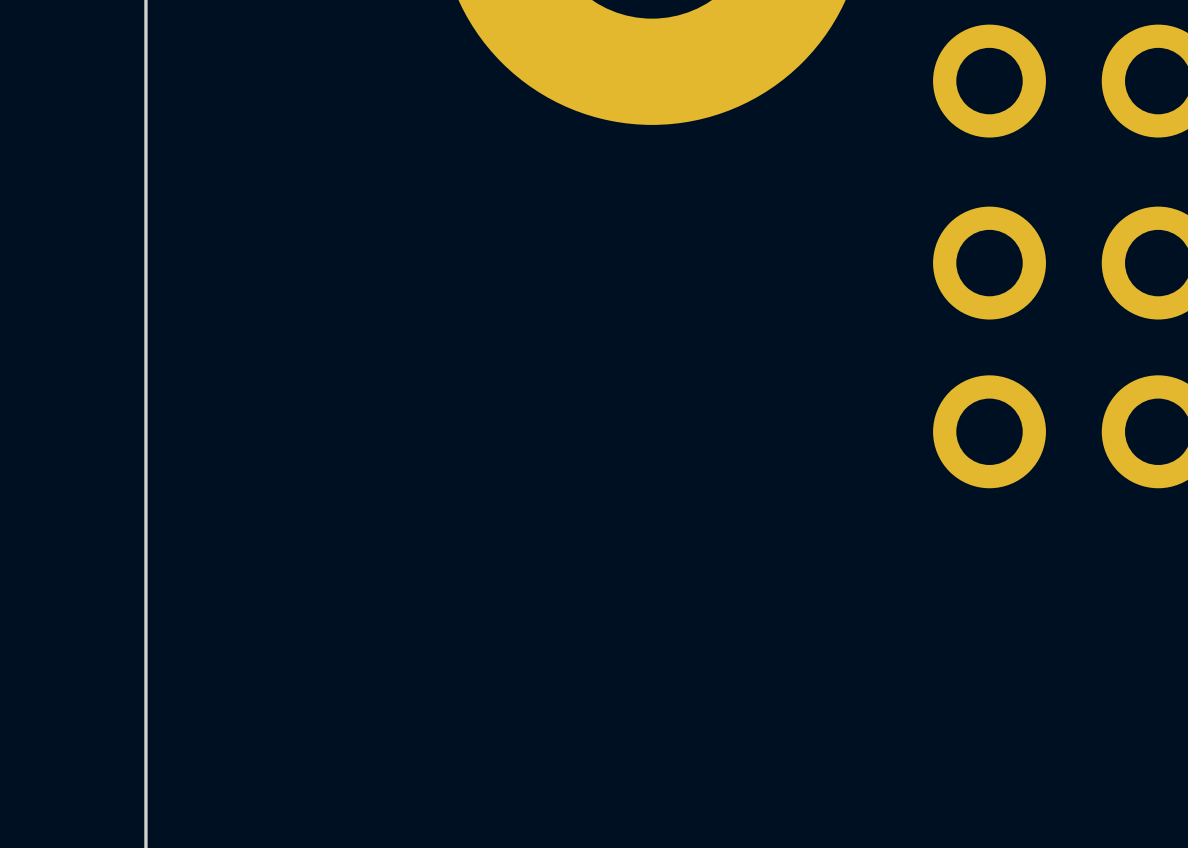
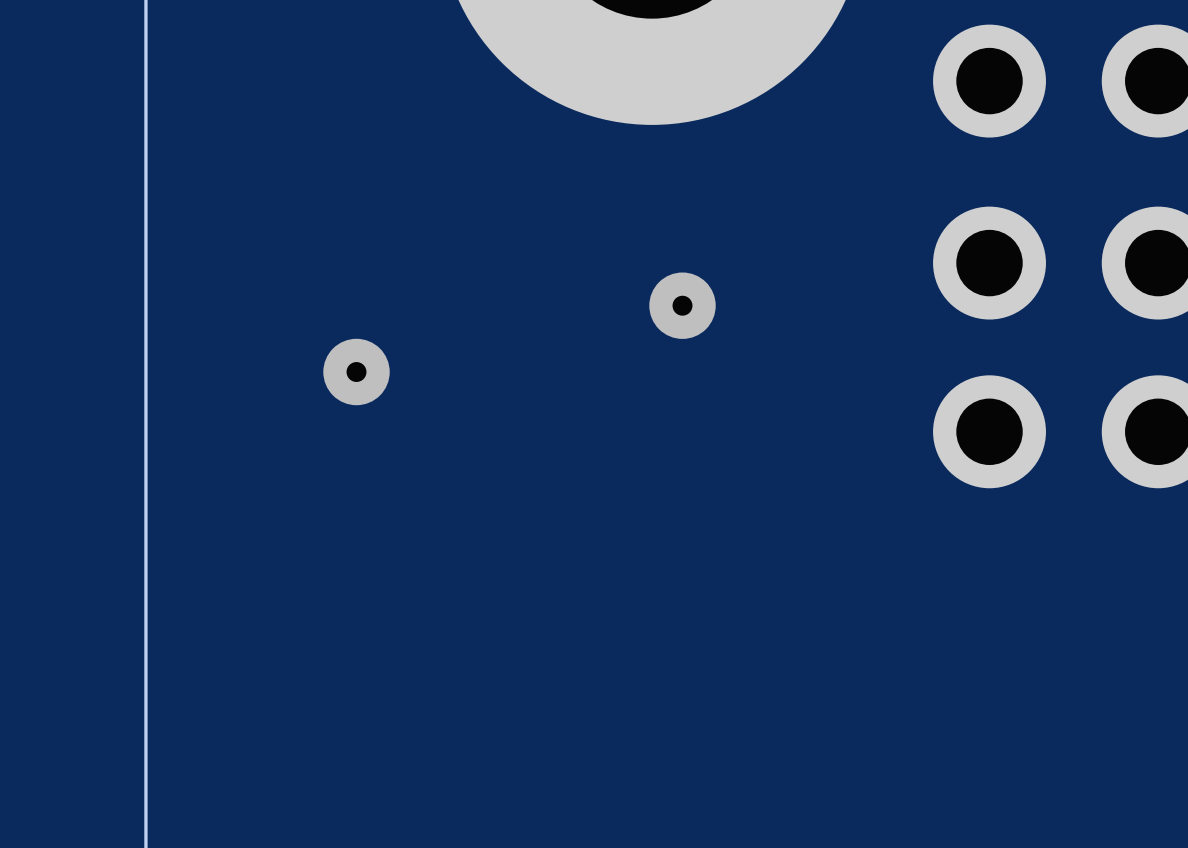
via: none -> (682, 305)
via: none -> (356, 372)

